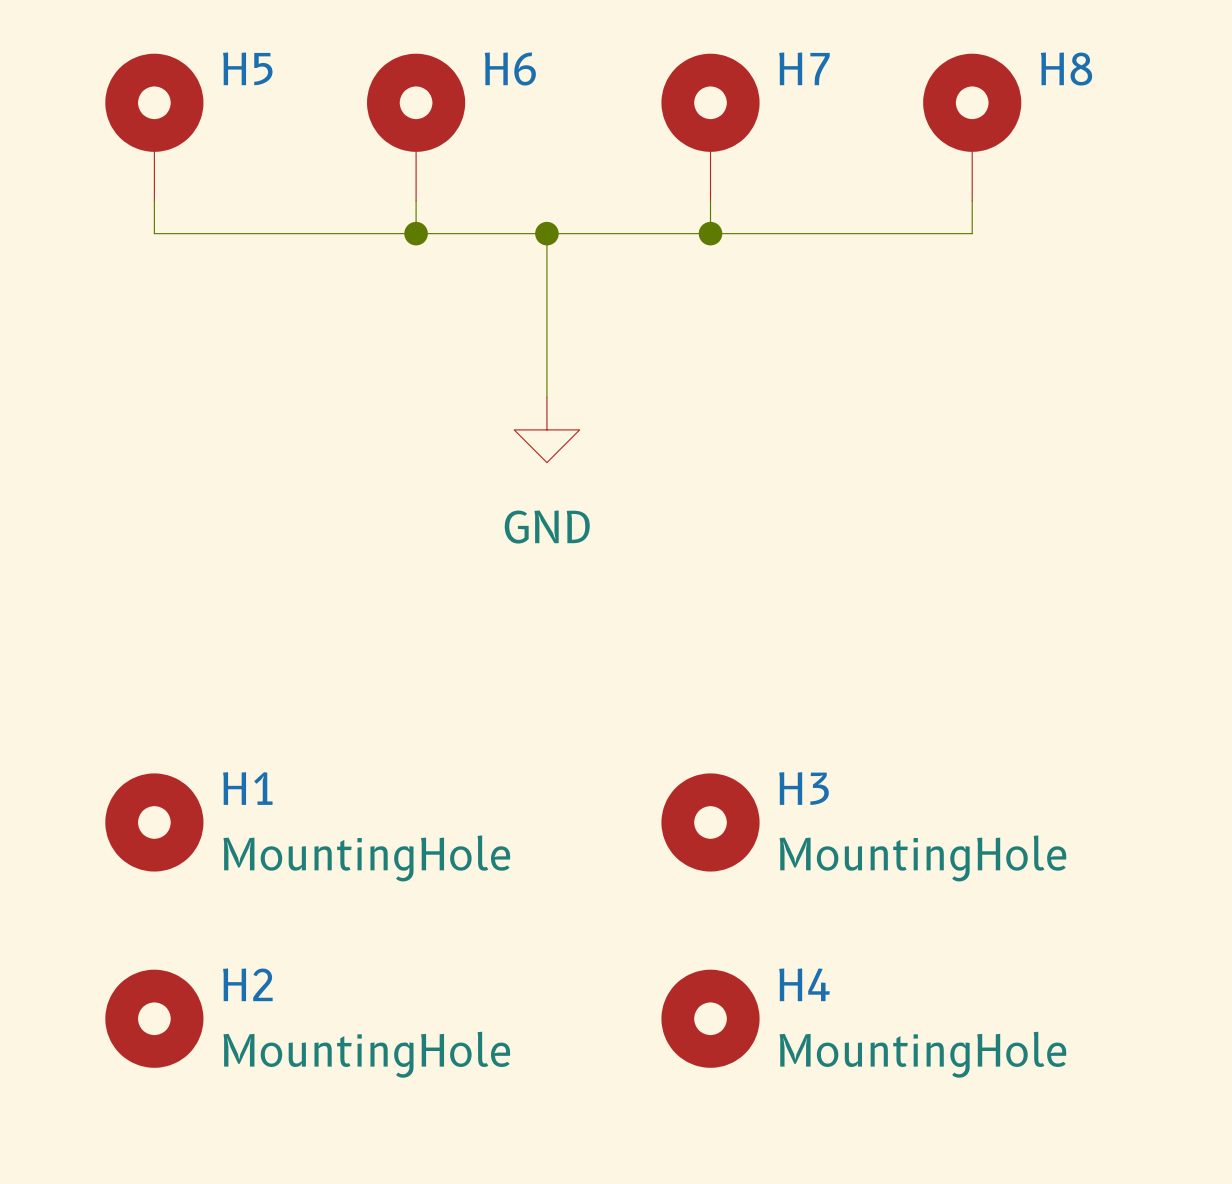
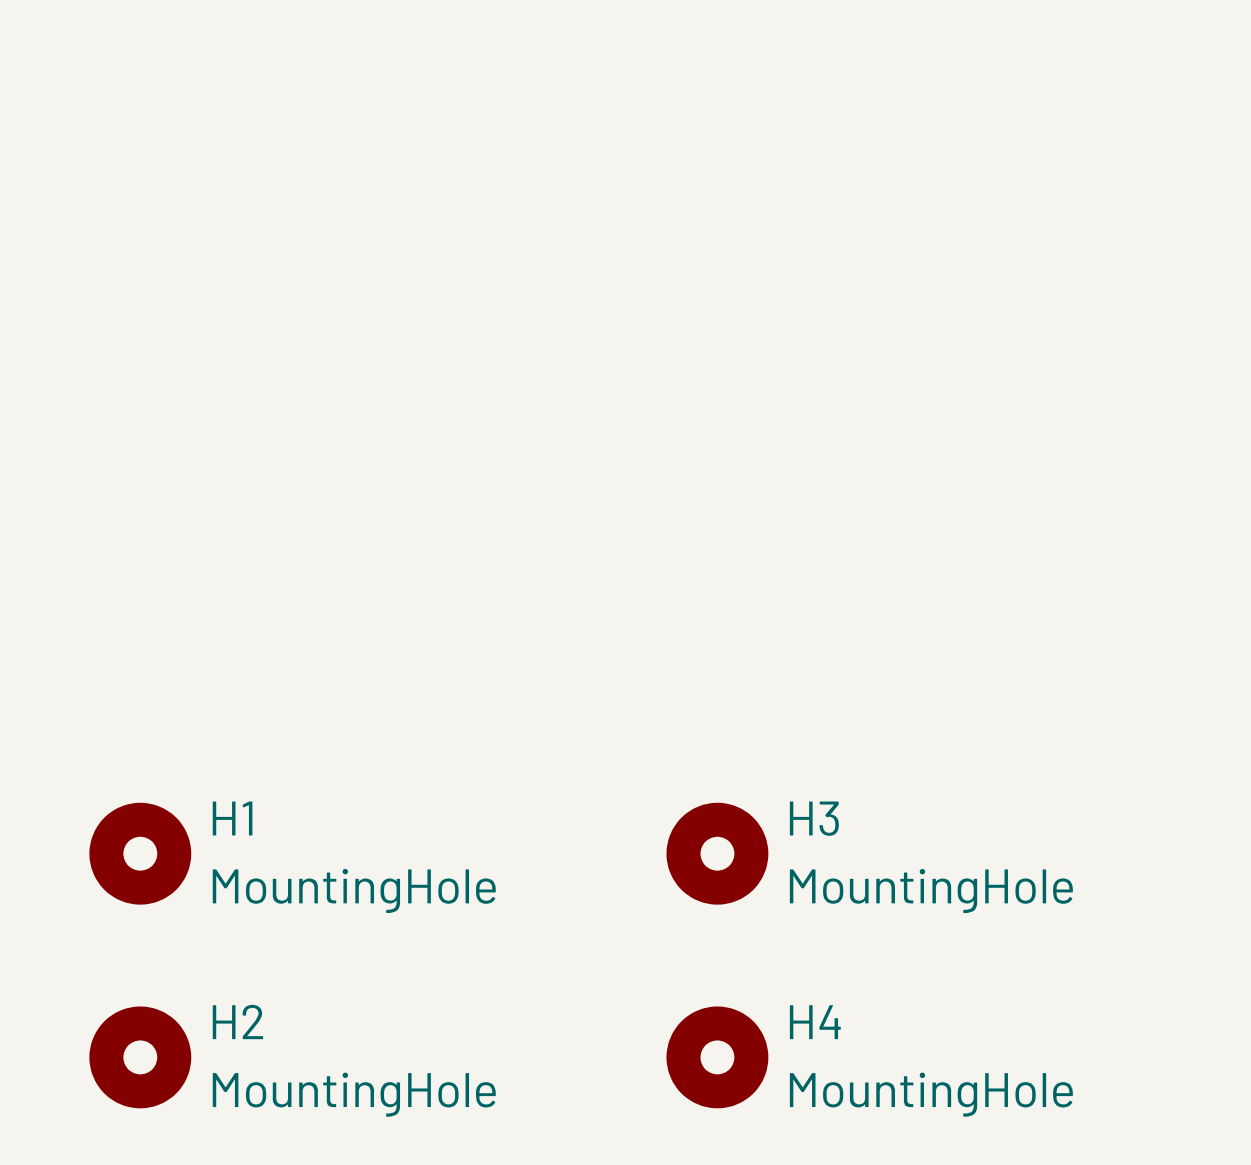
H5: (154, 127) -> none
H6: (416, 127) -> none
H7: (710, 127) -> none
H8: (972, 127) -> none
wire: (154, 200) (154, 233) (972, 233) (972, 200) -> none
wire: (416, 200) (416, 233) -> none
wire: (710, 200) (710, 233) -> none
junction: (416, 233) -> none
wire: (546, 233) (546, 397) -> none
junction: (546, 233) -> none
junction: (710, 233) -> none
power symbol: GND (546, 429) -> none

